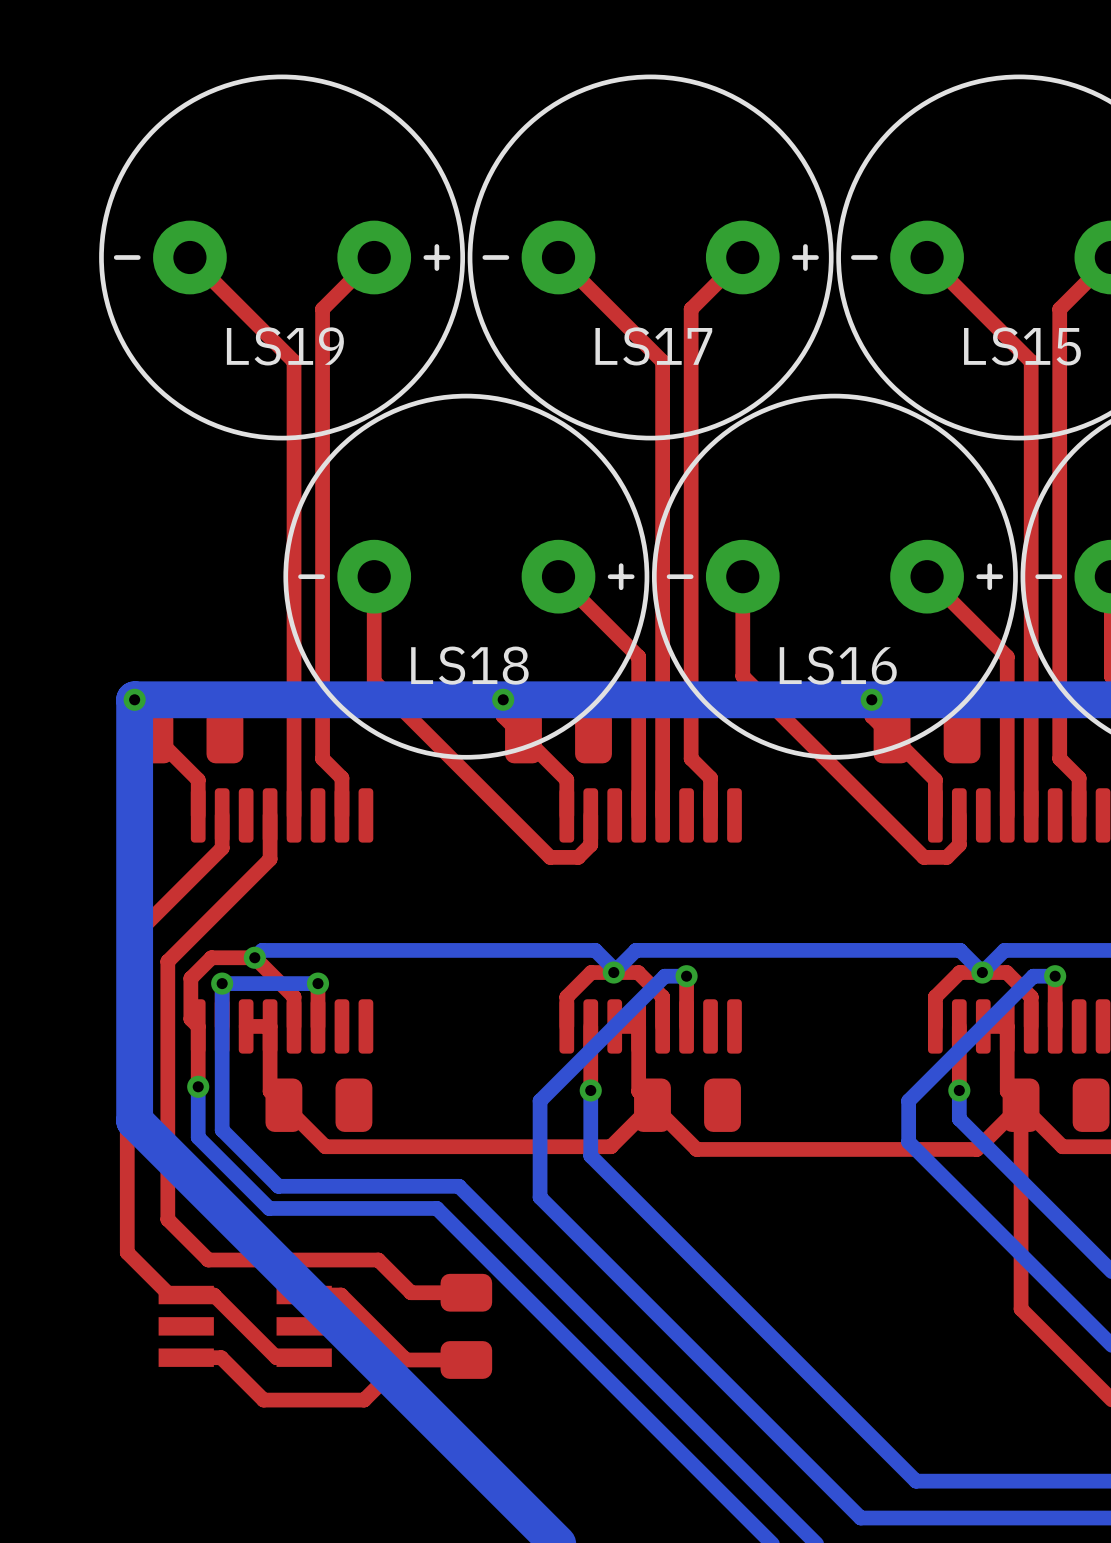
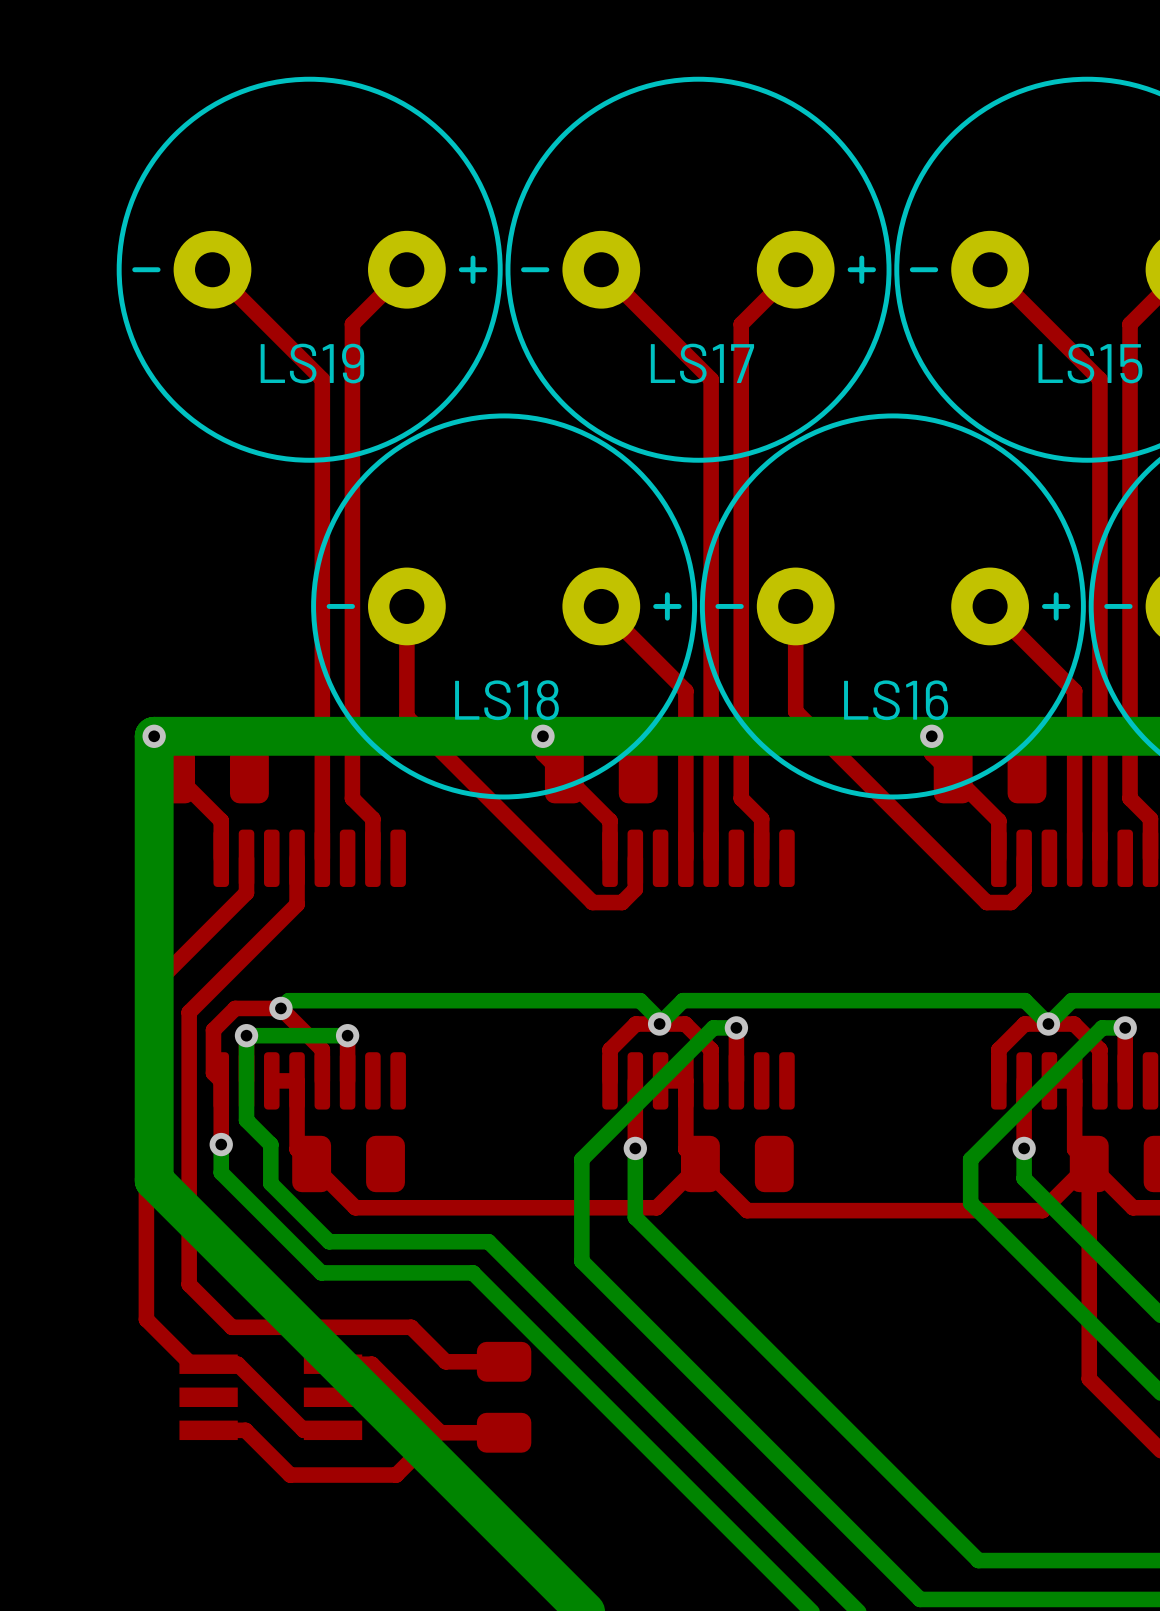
bottom track: (222, 1063) (222, 1130) (278, 1186) (458, 1186) -> (246, 1120) (270, 1144) (270, 1183) (329, 1241) (488, 1241) (496, 1249)
bottom track: (198, 1113) (198, 1137) (269, 1208) (293, 1208) -> (221, 1172) (321, 1272)

